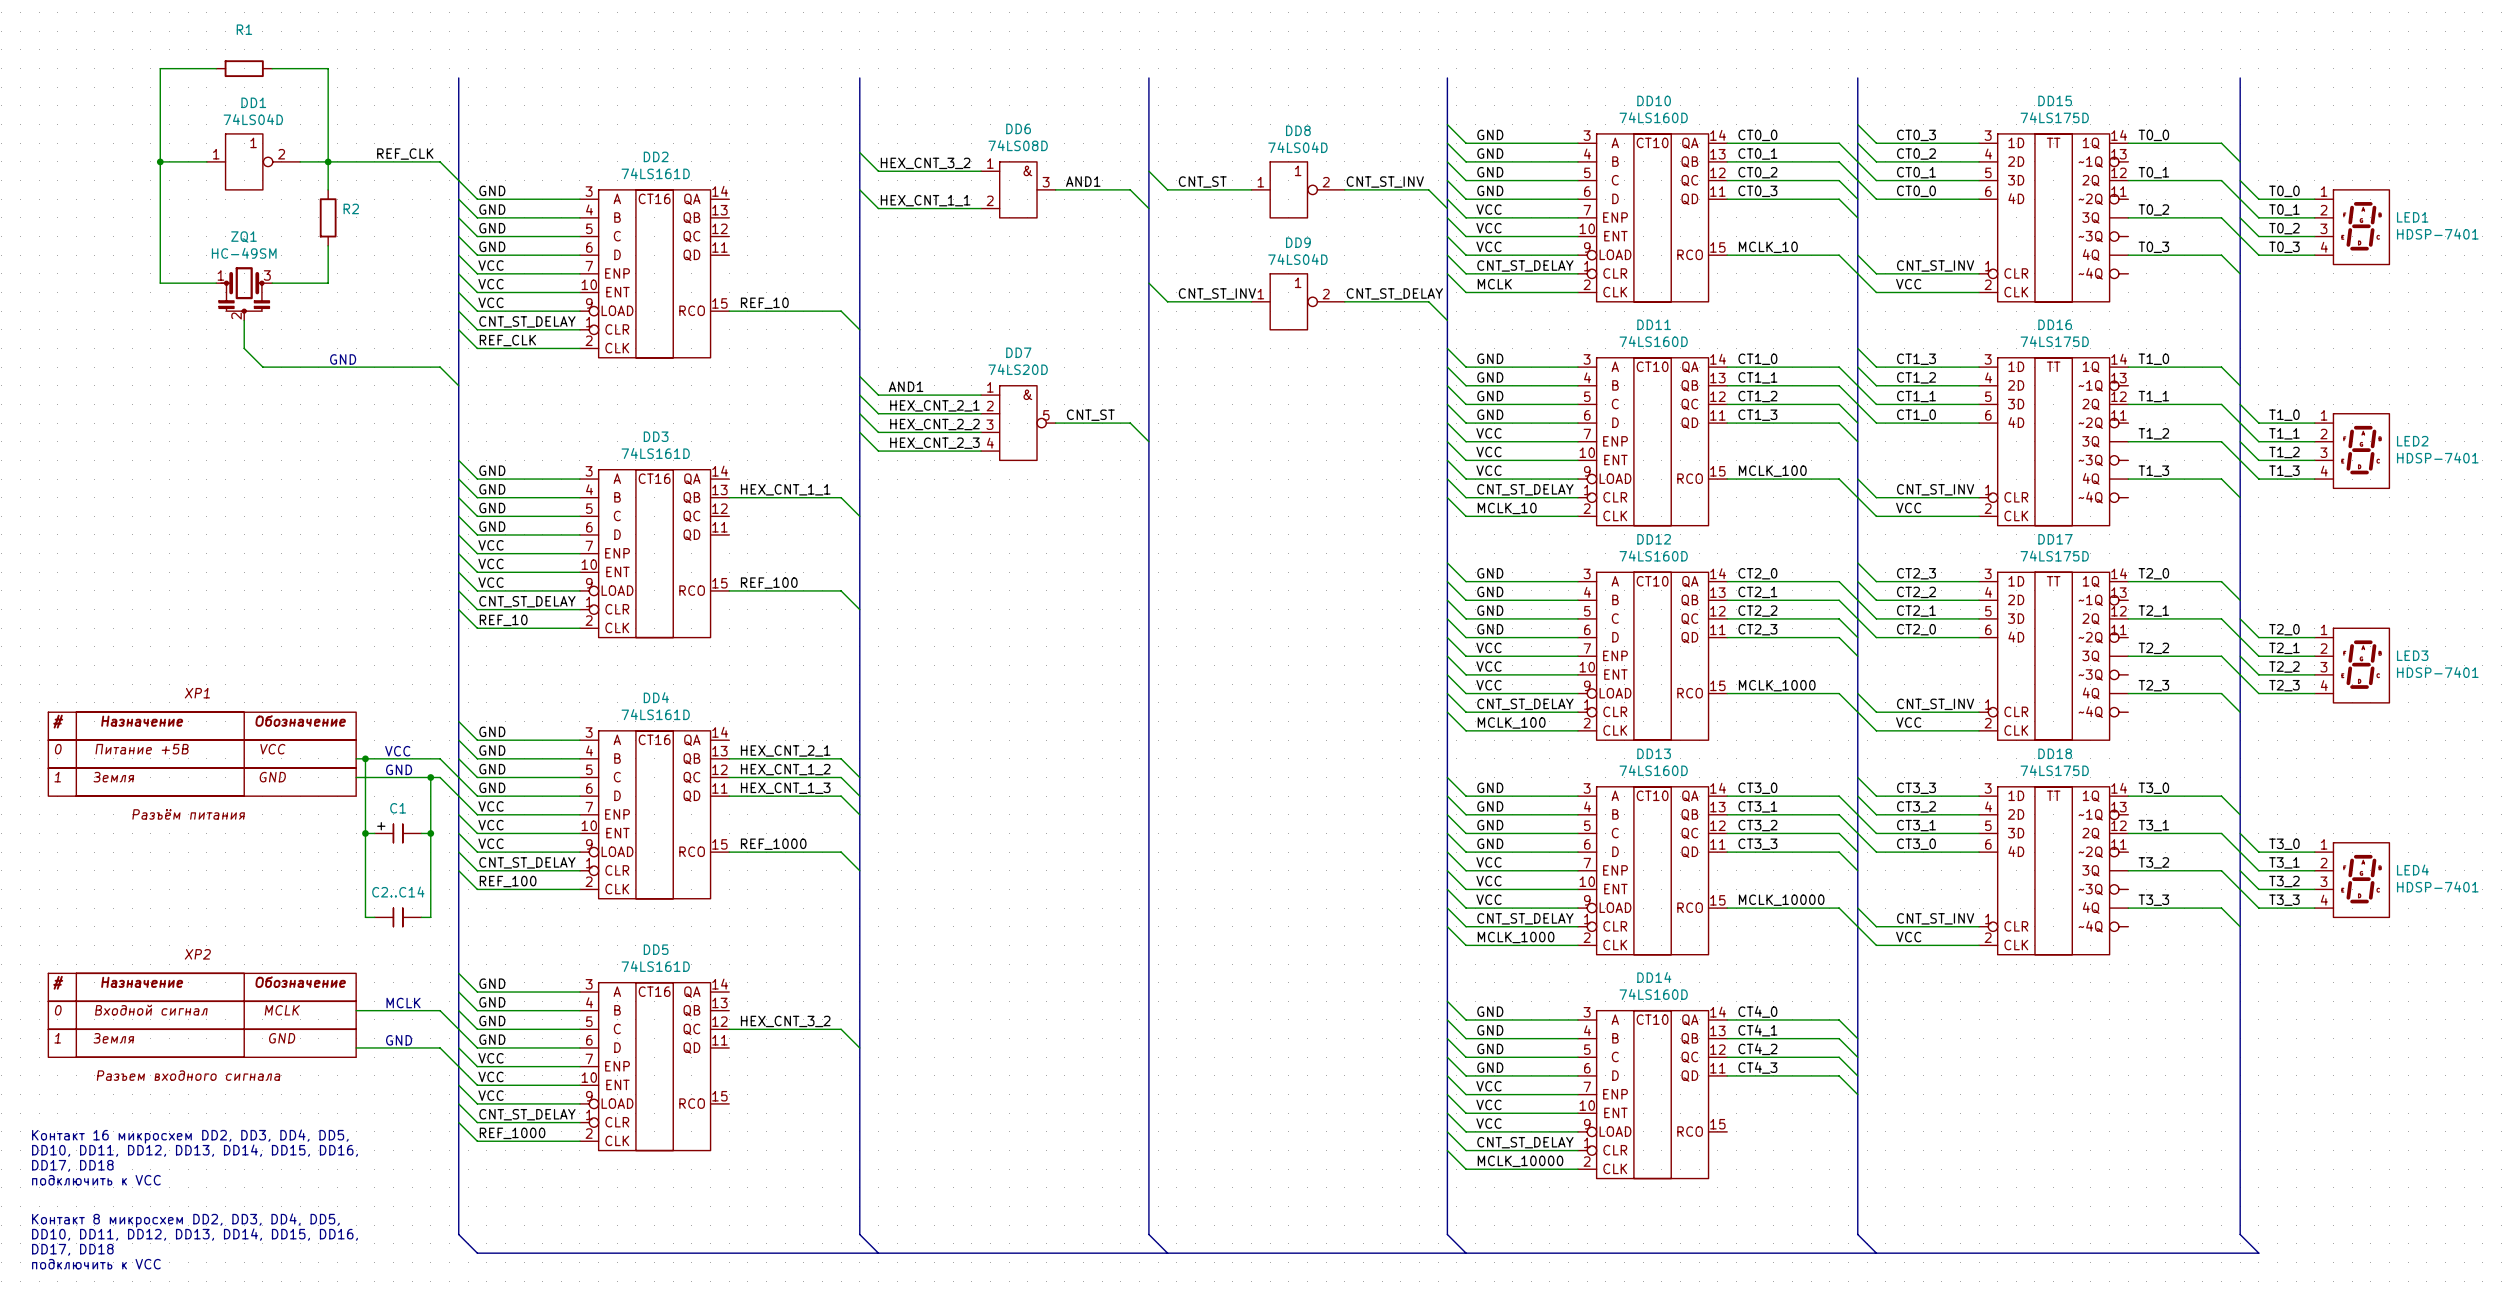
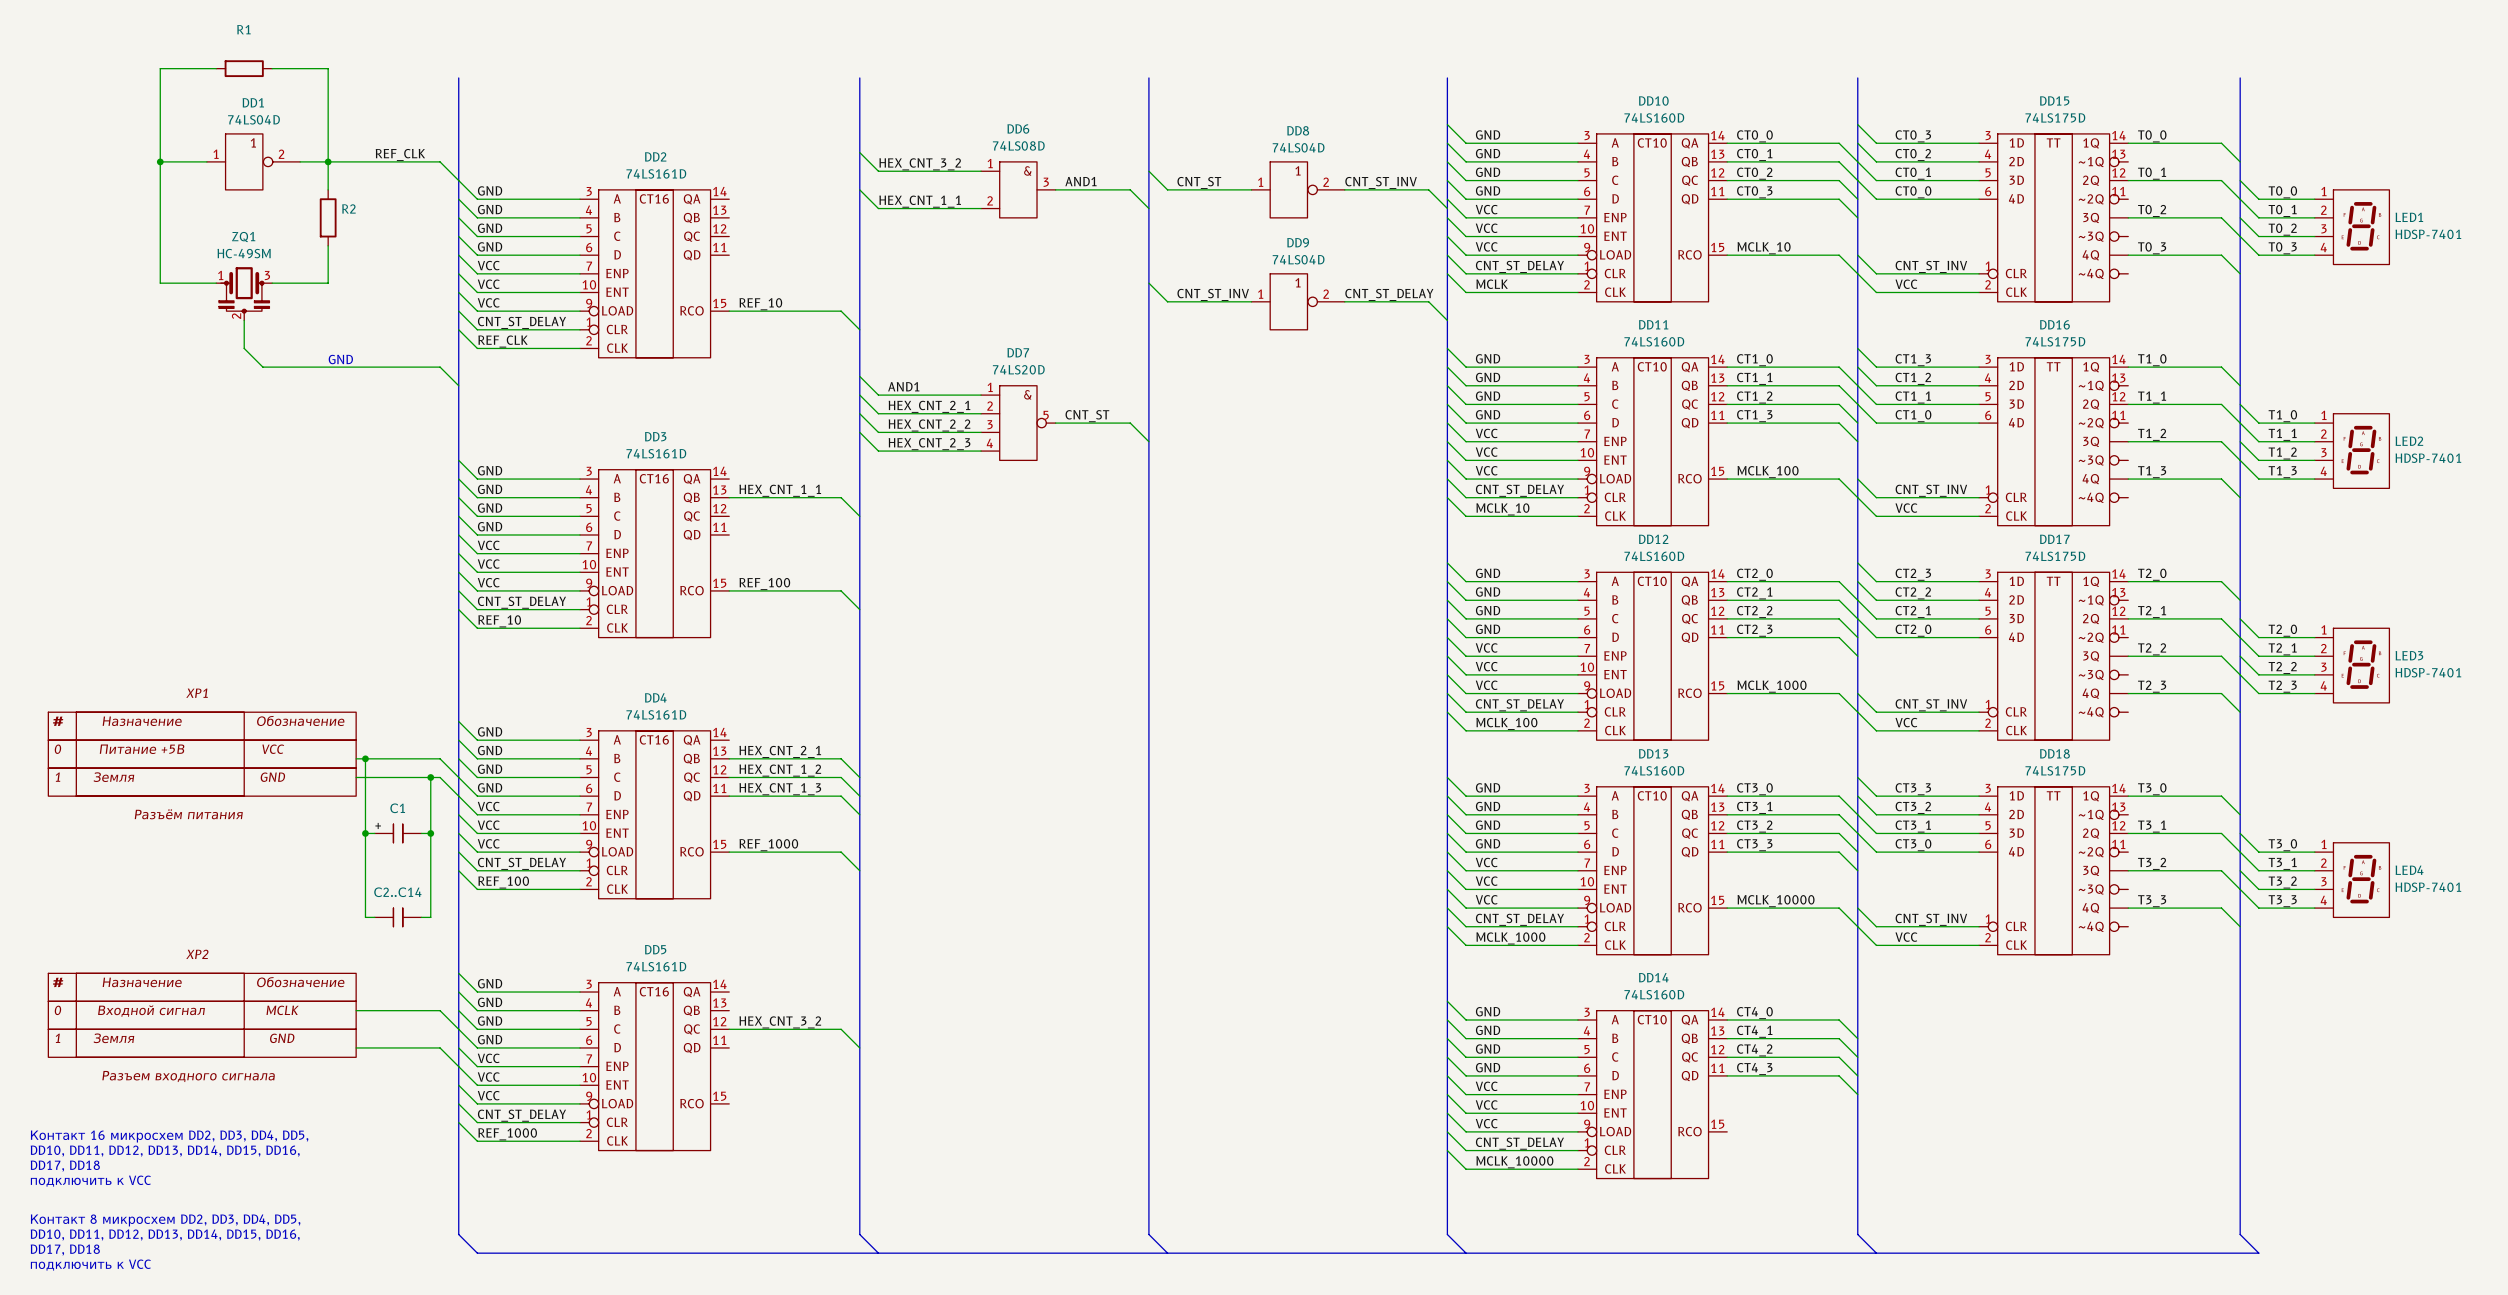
text: VCC (397, 751) -> none
text: GND (399, 769) -> none
text: MCLK (403, 1003) -> none
text: GND (399, 1040) -> none

